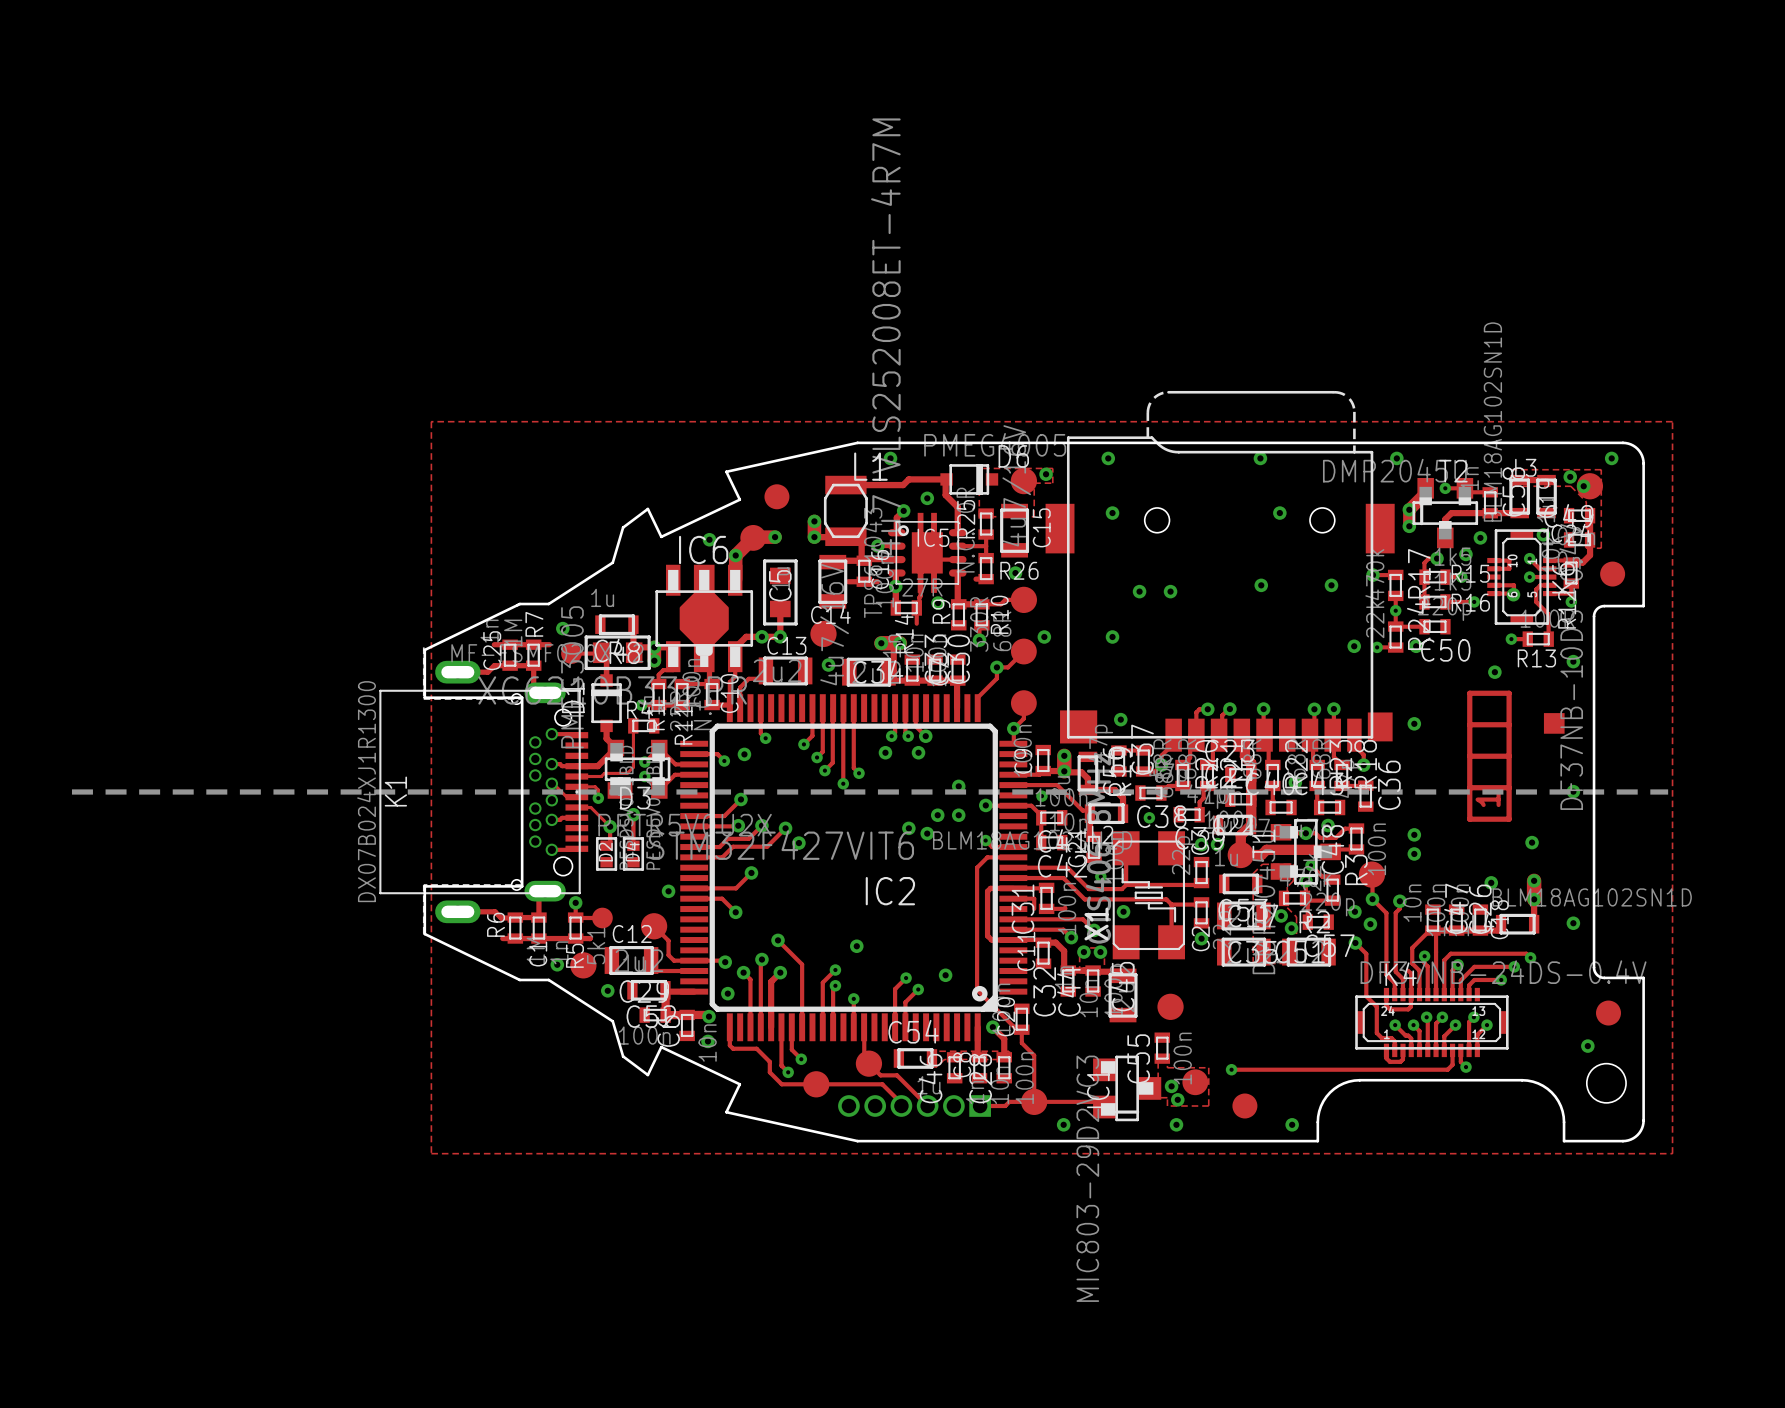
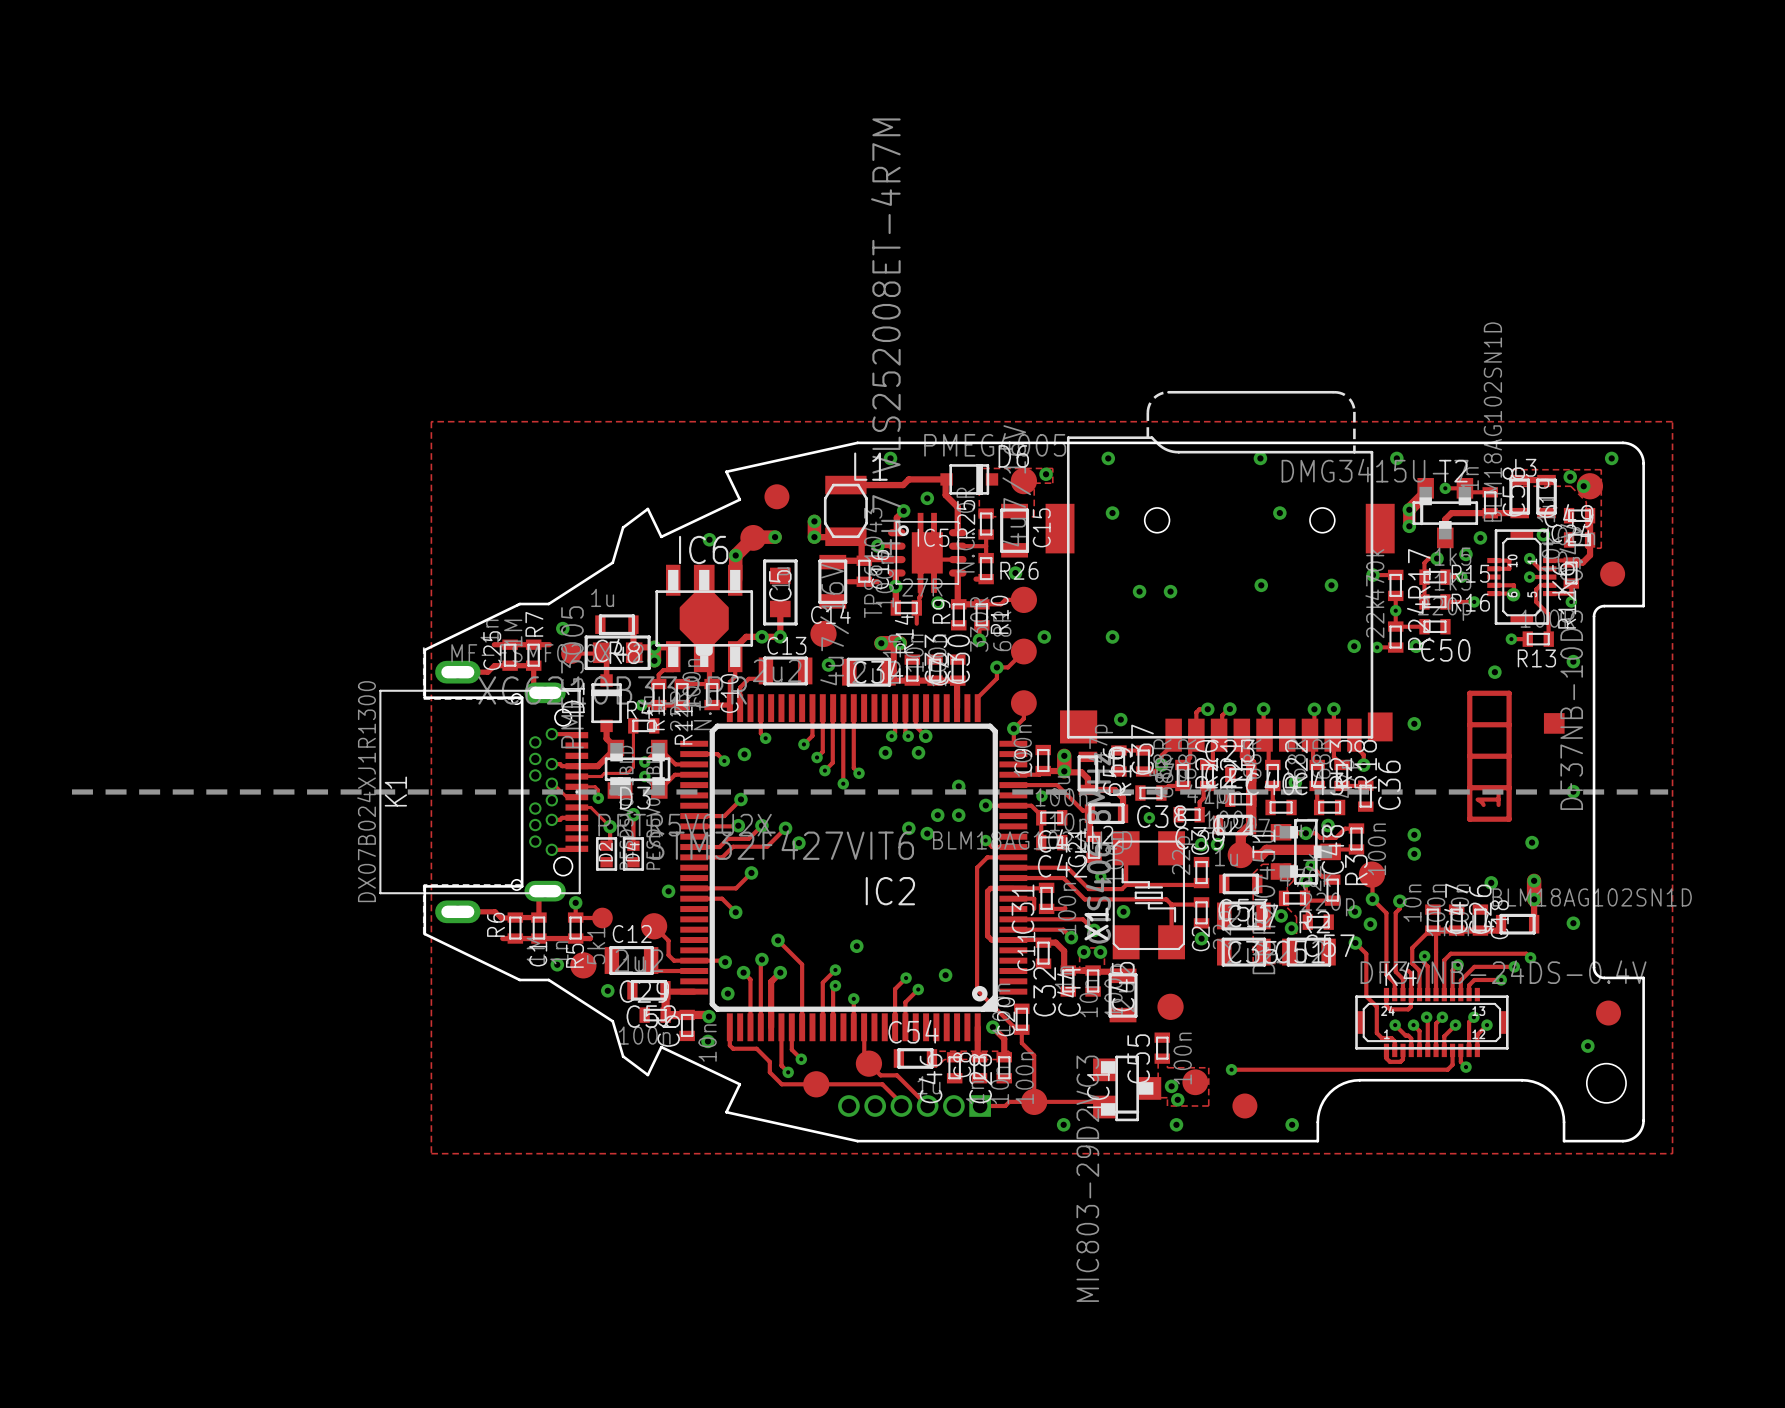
T2 value: DMP2045U (1394, 470) -> DMG3415U-7 (1375, 470)

